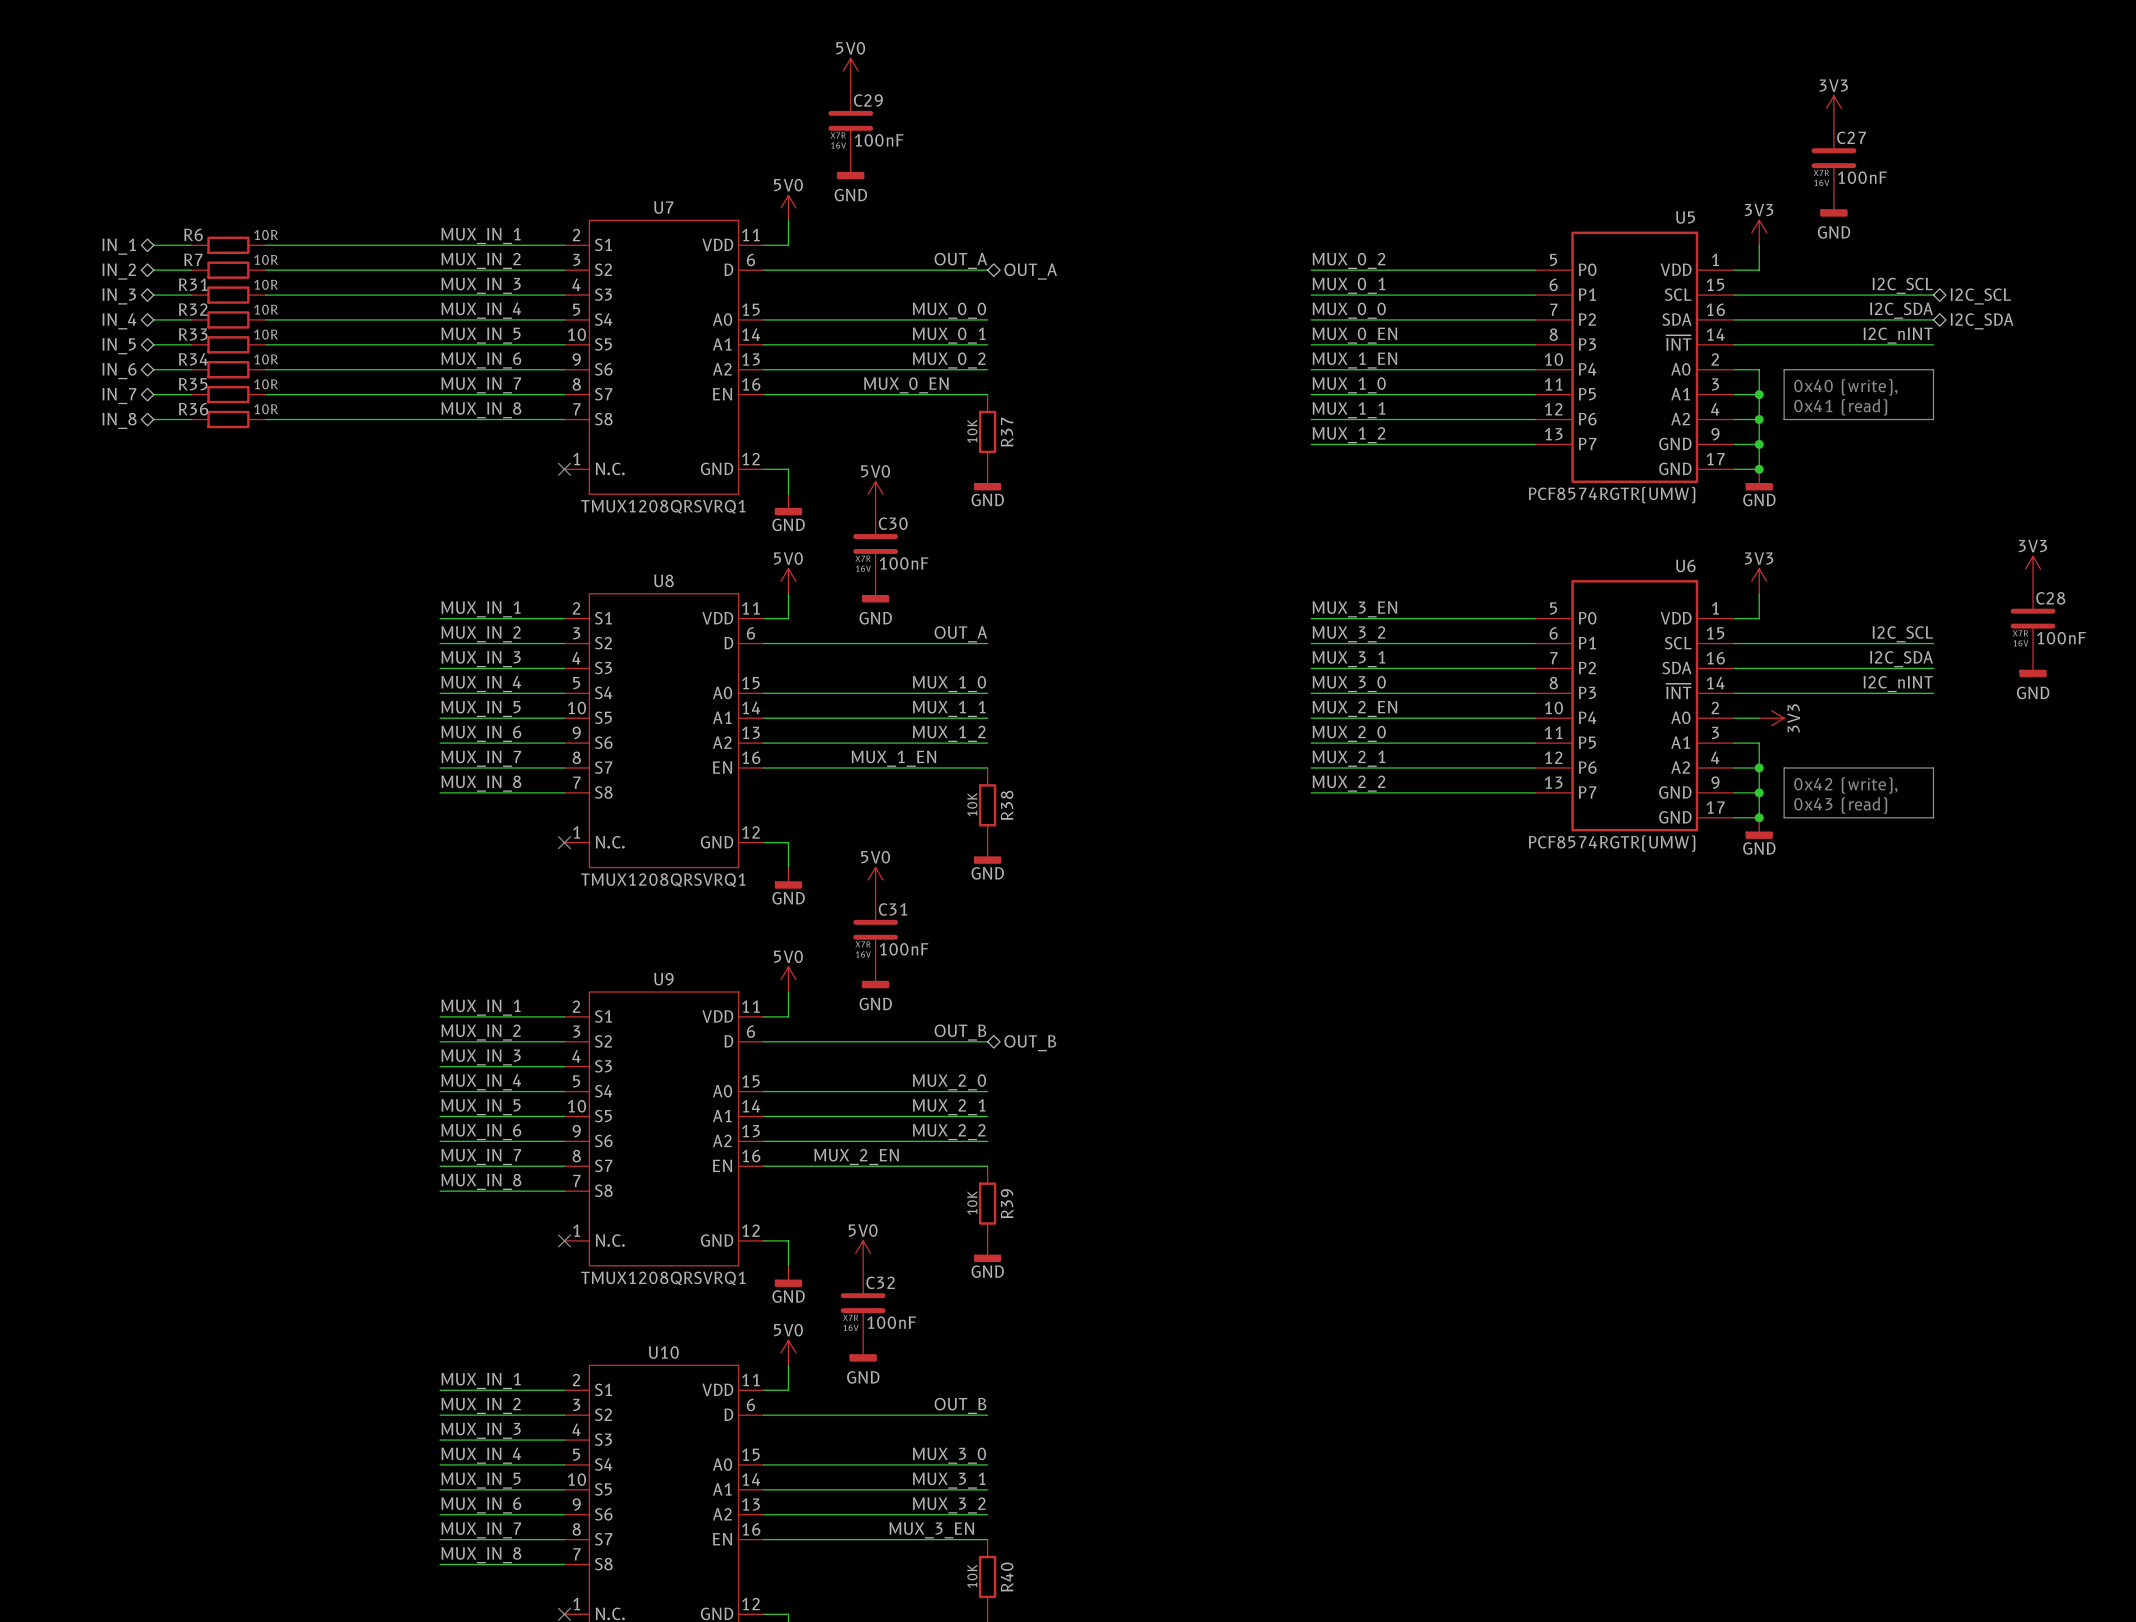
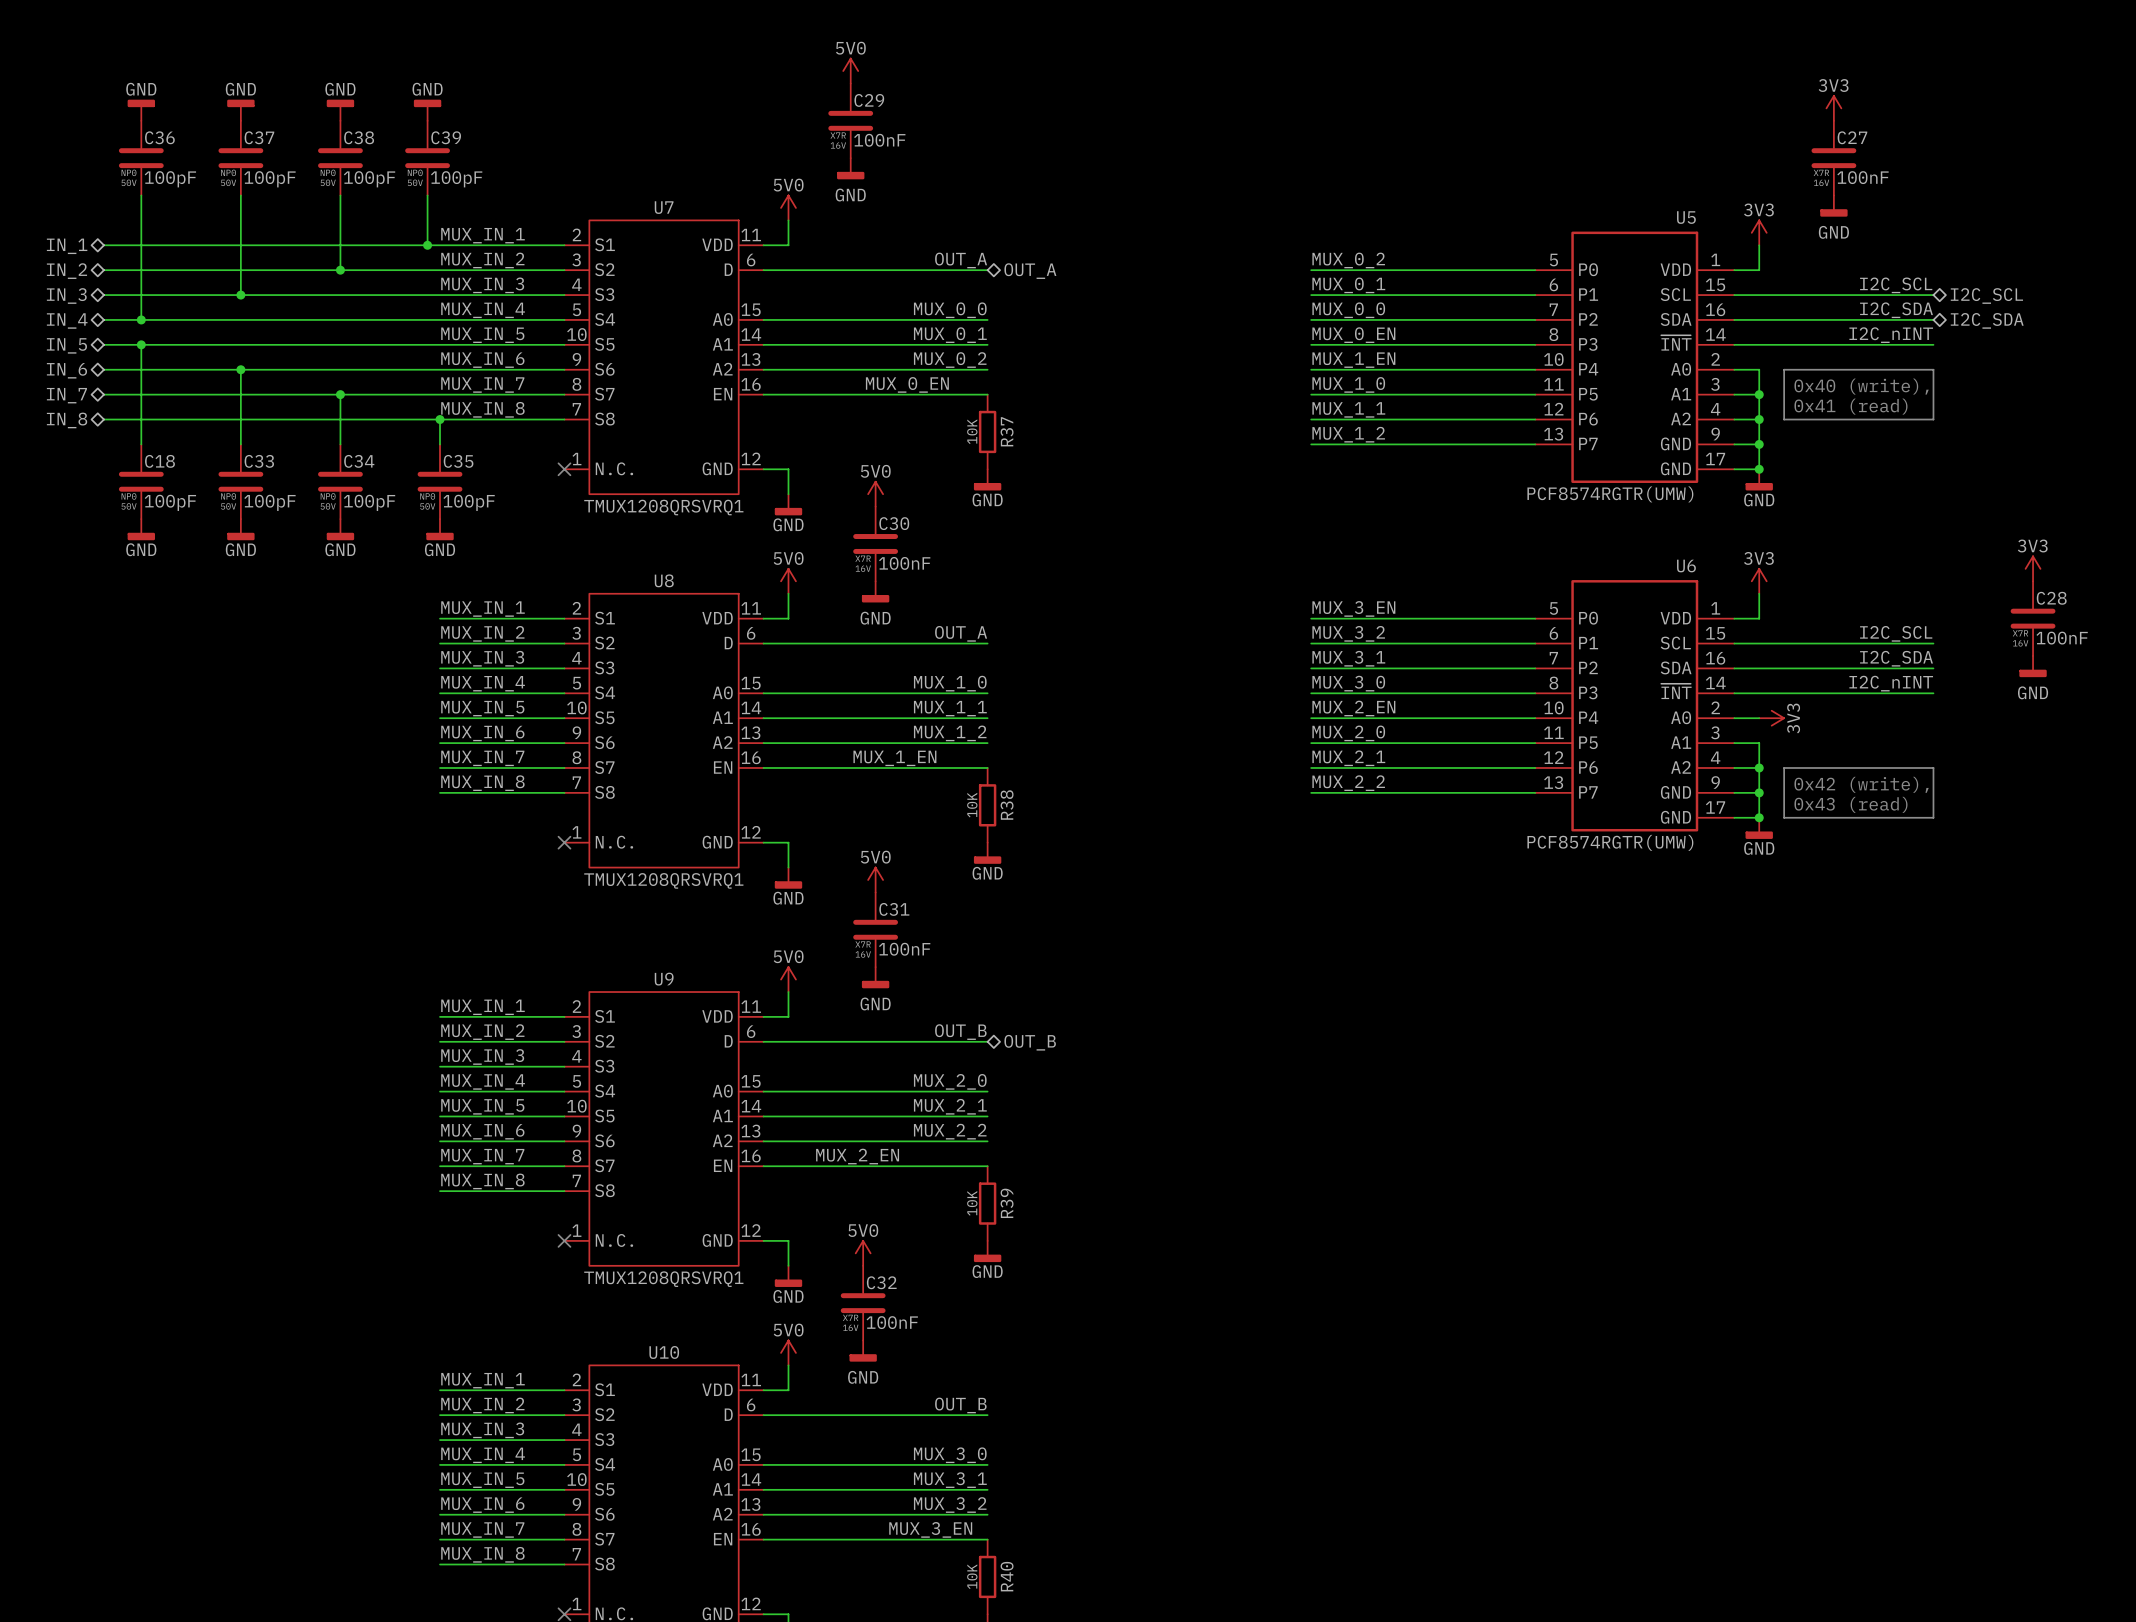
power symbol: none -> GND (141, 110)
power symbol: none -> GND (240, 110)
power symbol: none -> GND (340, 110)
power symbol: none -> GND (427, 110)
C36: none -> 100pF (141, 158)
C37: none -> 100pF (240, 158)
C38: none -> 100pF (340, 158)
C39: none -> 100pF (427, 158)
wire: none -> (141, 195) (141, 319)
wire: none -> (240, 195) (240, 295)
wire: none -> (340, 195) (340, 270)
wire: none -> (427, 195) (427, 245)
wire: none -> (103, 245) (153, 245)
wire: none -> (191, 245) (265, 245)
R6: 10R (228, 245) -> none
junction: none -> (427, 245)
hierarchical label position: IN_1 (119, 246) -> IN_1 (67, 246)
wire: none -> (103, 270) (153, 270)
wire: none -> (191, 270) (265, 270)
R7: 10R (228, 270) -> none
junction: none -> (340, 270)
hierarchical label position: IN_2 (119, 271) -> IN_2 (66, 271)
wire: none -> (103, 295) (153, 295)
wire: none -> (191, 295) (265, 295)
R31: 10R (228, 295) -> none
junction: none -> (240, 295)
hierarchical label position: IN_3 (119, 296) -> IN_3 (66, 296)
wire: none -> (103, 319) (153, 319)
junction: none -> (141, 319)
wire: none -> (191, 319) (265, 319)
R32: 10R (228, 319) -> none
hierarchical label position: IN_4 (119, 321) -> IN_4 (67, 321)
wire: none -> (103, 344) (153, 344)
wire: none -> (141, 344) (141, 444)
junction: none -> (141, 344)
wire: none -> (191, 344) (265, 344)
R33: 10R (228, 344) -> none
hierarchical label position: IN_5 (119, 346) -> IN_5 (66, 345)
wire: none -> (103, 369) (153, 369)
wire: none -> (191, 369) (265, 369)
R34: 10R (228, 369) -> none
wire: none -> (240, 369) (240, 444)
junction: none -> (240, 369)
hierarchical label position: IN_6 (119, 371) -> IN_6 (66, 370)
wire: none -> (103, 394) (153, 394)
wire: none -> (191, 394) (265, 394)
R35: 10R (228, 394) -> none
wire: none -> (340, 394) (340, 444)
junction: none -> (340, 394)
hierarchical label position: IN_7 (119, 396) -> IN_7 (66, 395)
wire: none -> (103, 419) (153, 419)
wire: none -> (191, 419) (265, 419)
R36: 10R (228, 419) -> none
wire: none -> (440, 419) (440, 444)
junction: none -> (440, 419)
hierarchical label position: IN_8 (119, 420) -> IN_8 (67, 420)
C18: none -> 100pF (141, 481)
C33: none -> 100pF (240, 481)
C34: none -> 100pF (340, 481)
C35: none -> 100pF (440, 481)
power symbol: none -> GND (141, 529)
power symbol: none -> GND (240, 529)
power symbol: none -> GND (340, 529)
power symbol: none -> GND (440, 529)

